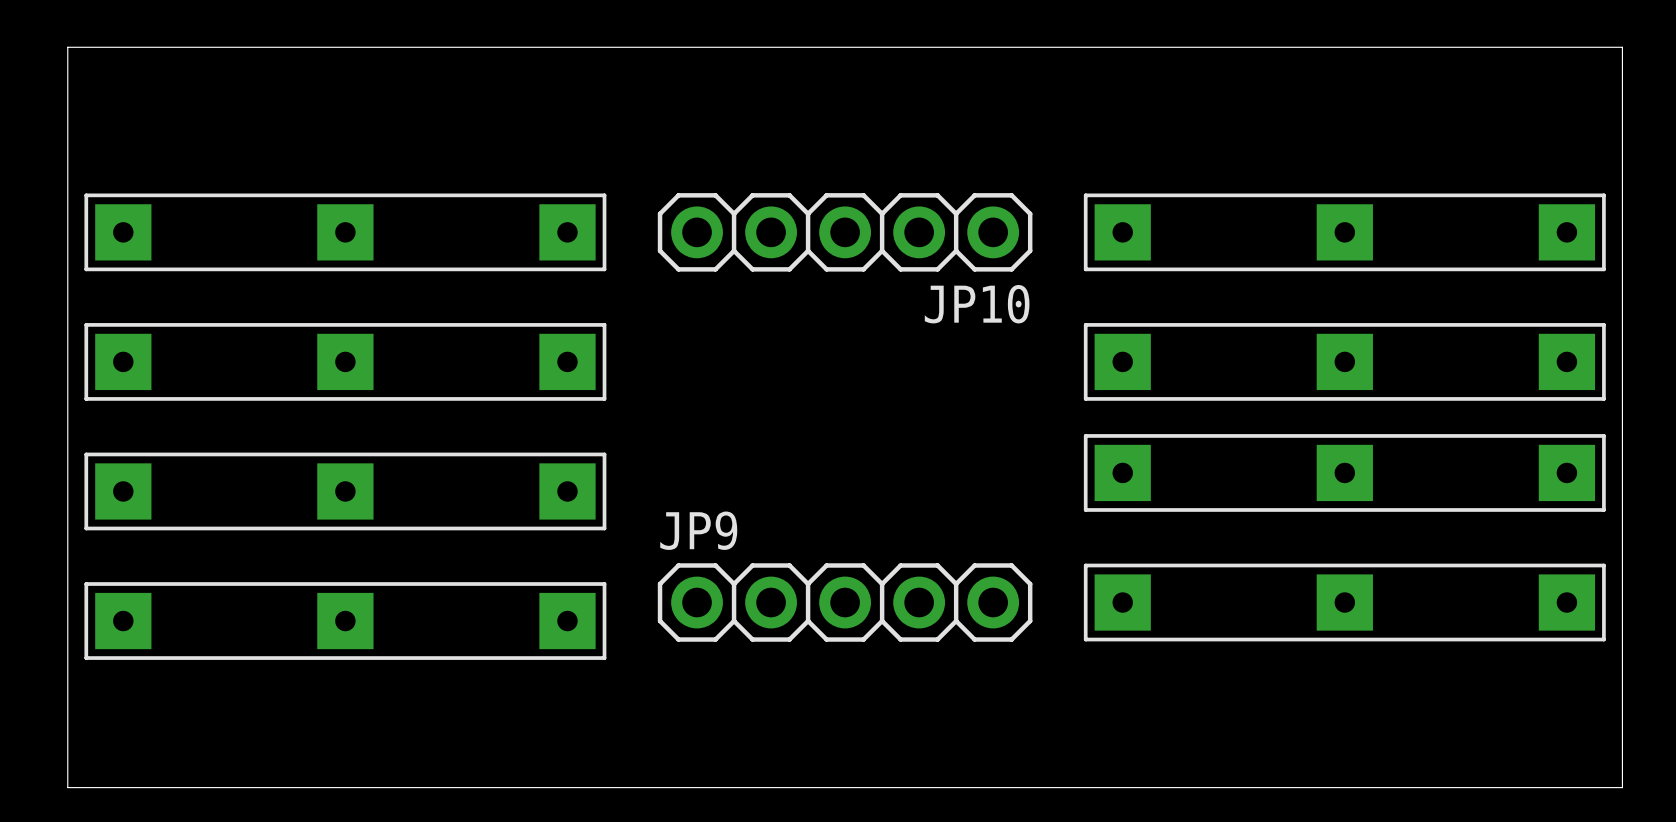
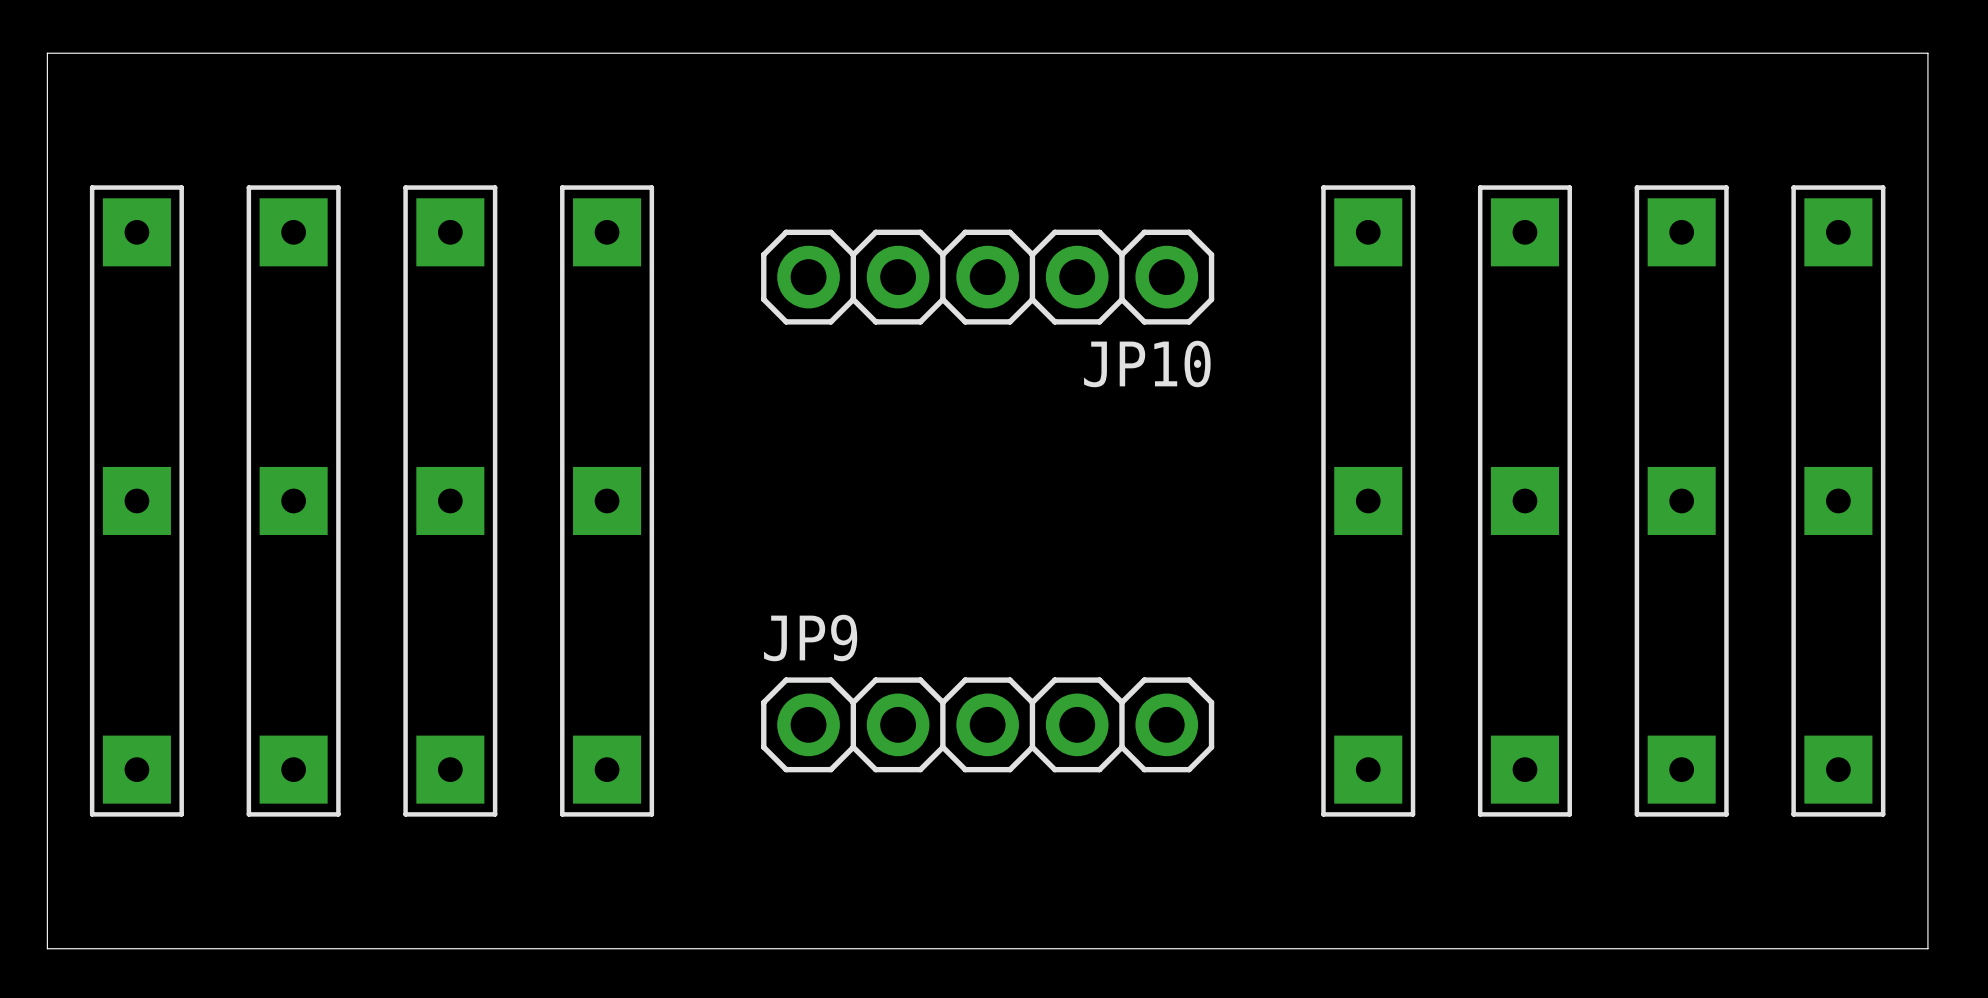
part: (345, 232) -> none
part: (1344, 232) -> none
part: (345, 361) -> none
part: (1344, 361) -> none
part: none -> (136, 500)
part: none -> (293, 500)
part: none -> (450, 500)
part: none -> (607, 500)
part: none -> (1368, 500)
part: none -> (1524, 500)
part: none -> (1681, 500)
part: none -> (1838, 500)
part: (1344, 472) -> none
part: (345, 491) -> none
part: (1344, 602) -> none
part: (345, 621) -> none

